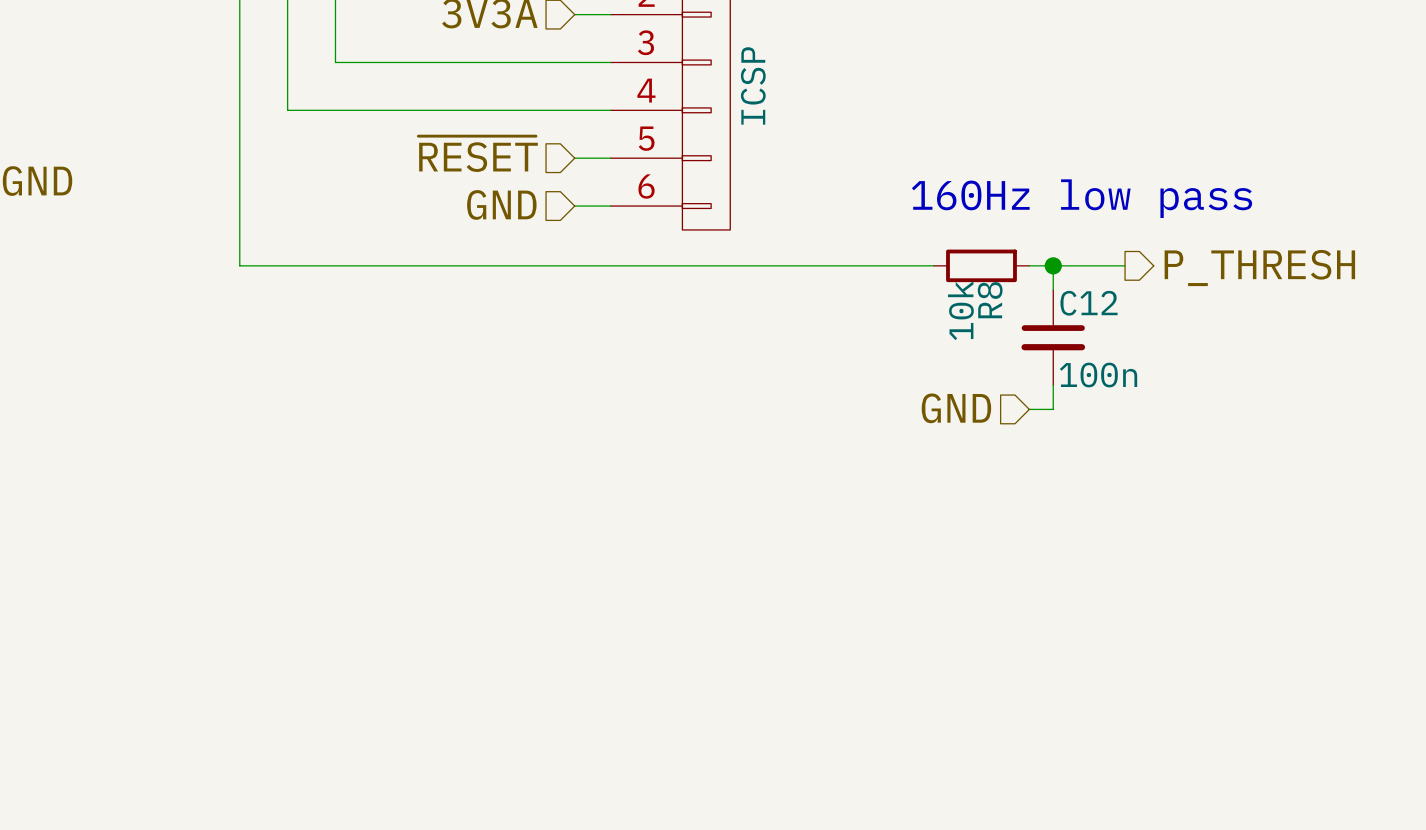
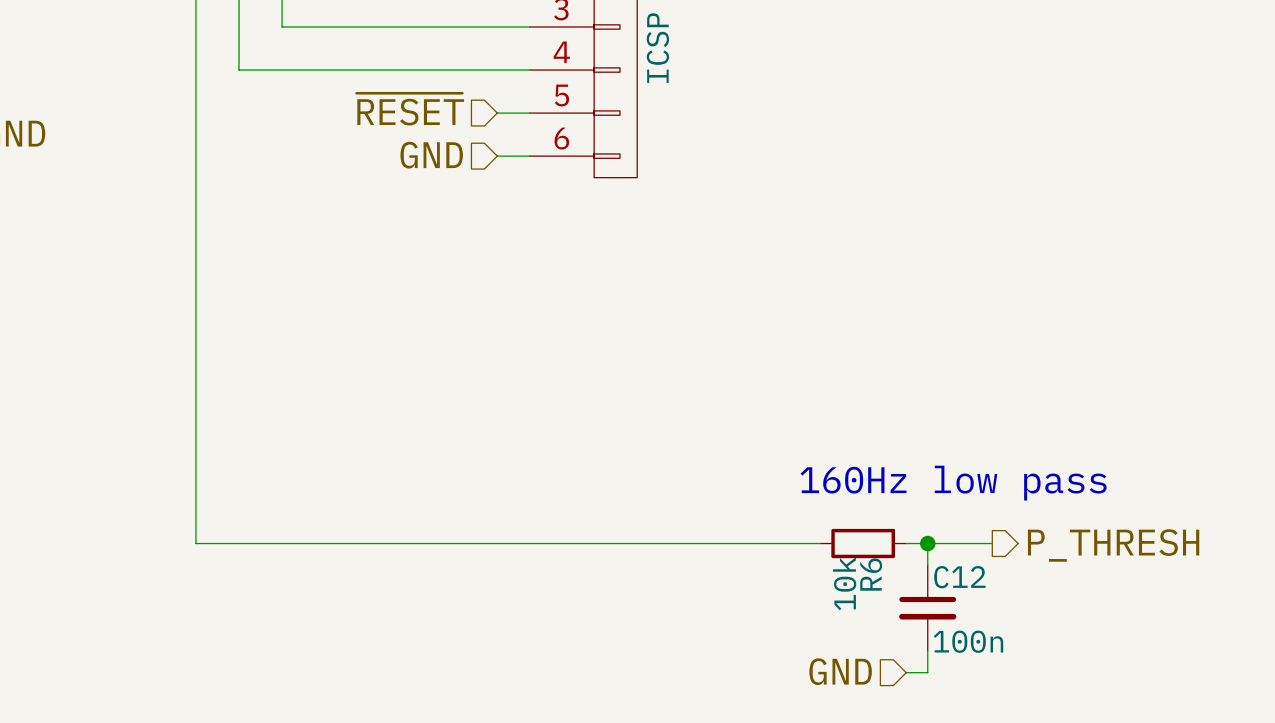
text position: 160Hz low pass (1082, 198) -> 160Hz low pass (953, 483)
wire: (239, 265) (933, 265) -> (195, 209) (195, 543) (820, 543)
R8: 10k (981, 265) -> none
wire: (1029, 265) (1125, 265) -> (906, 543) (992, 543)
wire: (1053, 265) (1053, 289) -> (927, 543) (927, 565)
junction: (1053, 265) -> none
hierarchical label position: P_THRESH (1259, 268) -> P_THRESH (1113, 545)
C12 position: (1053, 337) -> (927, 608)
wire: (1053, 385) (1053, 409) (1029, 409) -> (927, 651) (927, 672) (906, 672)
hierarchical label position: GND (956, 408) -> GND (840, 671)
R6: none -> 10k (863, 543)
junction: none -> (927, 543)

